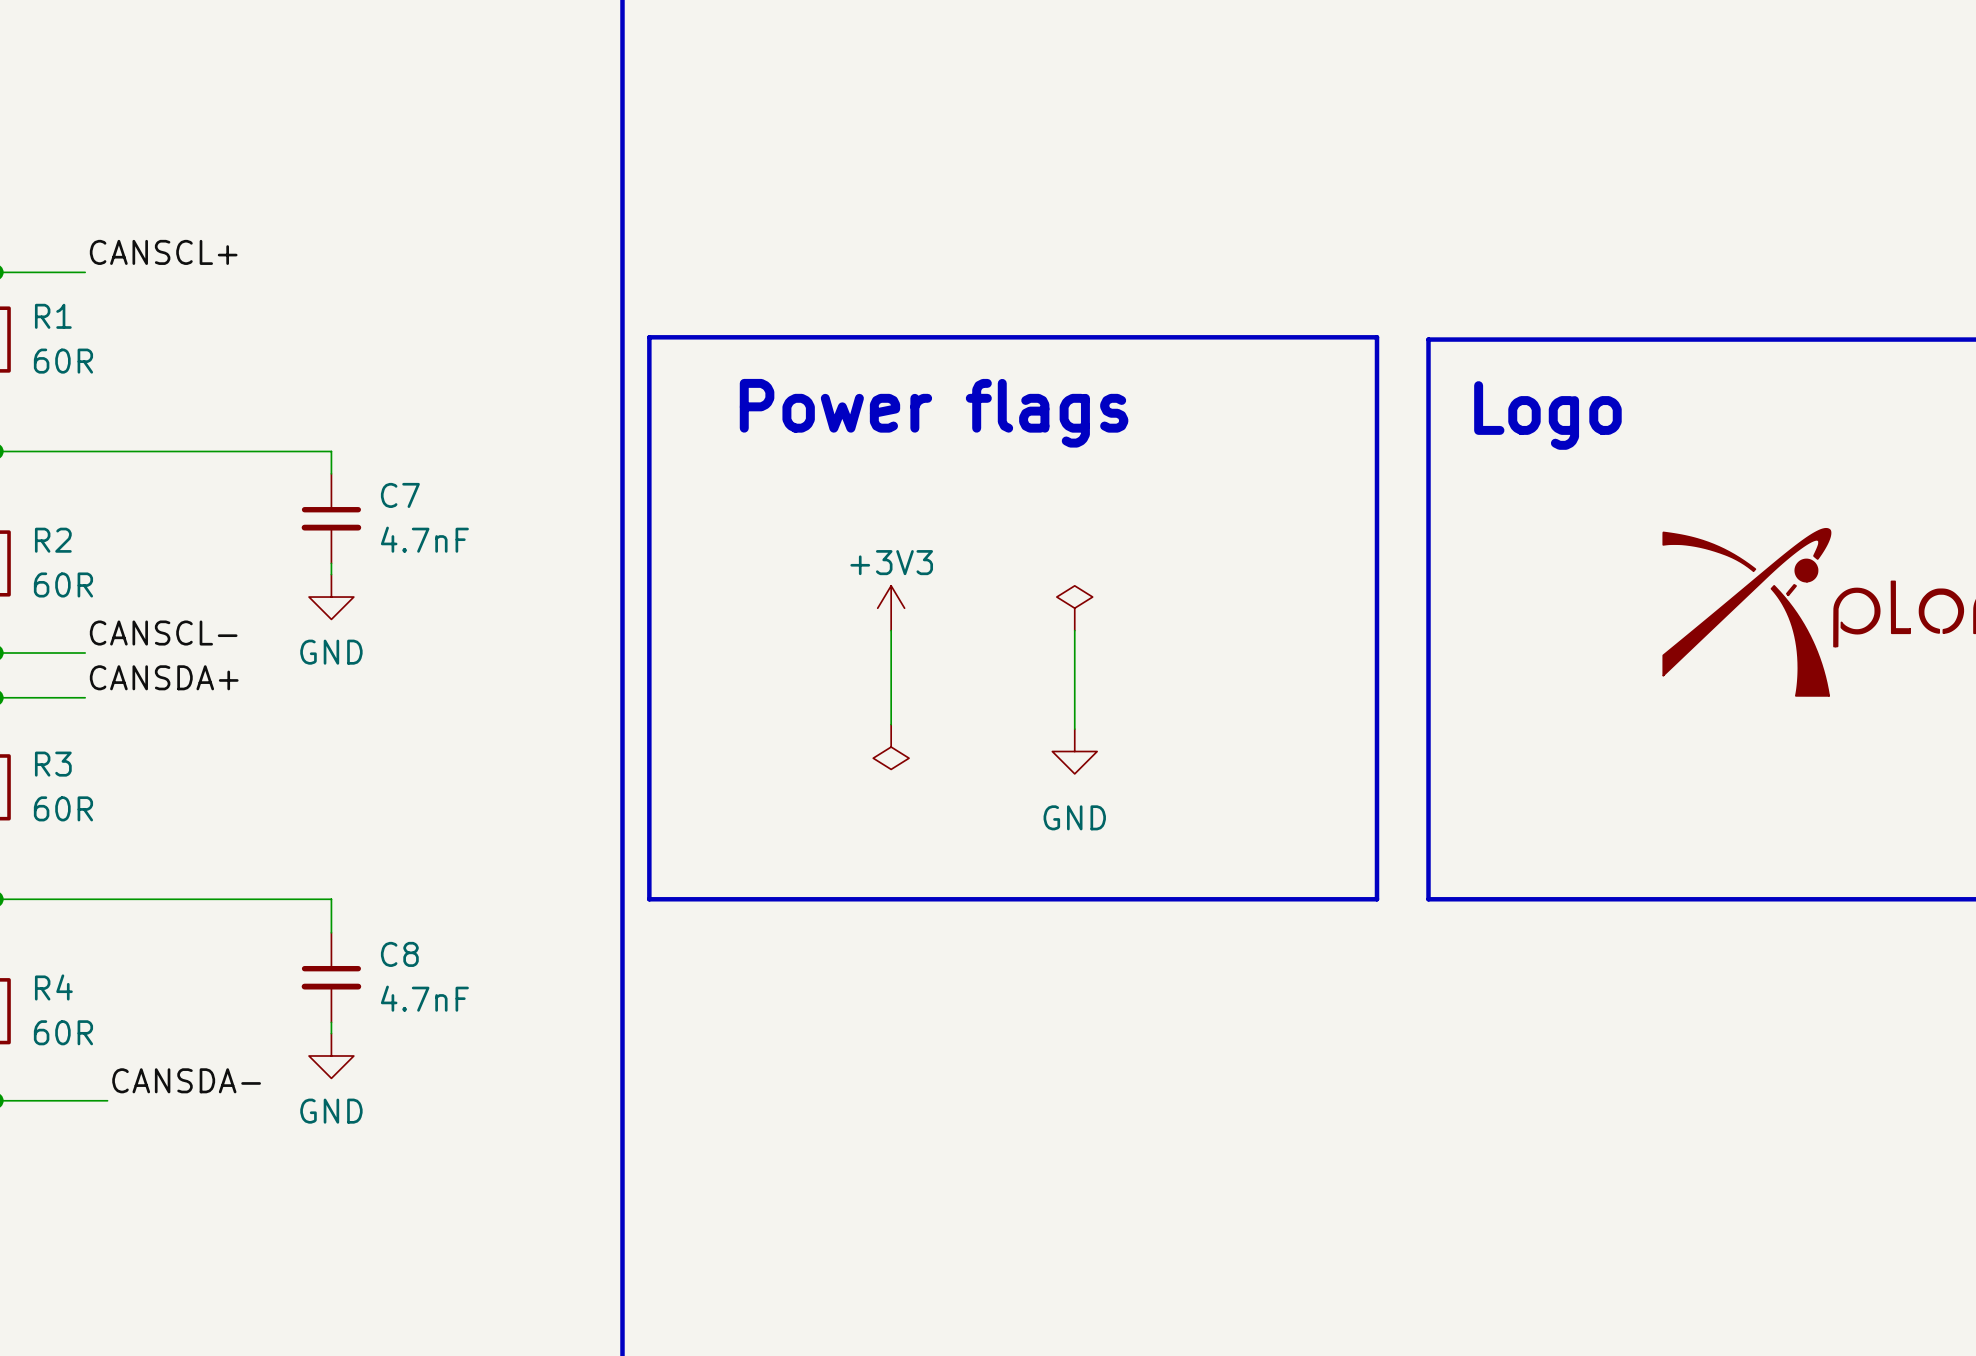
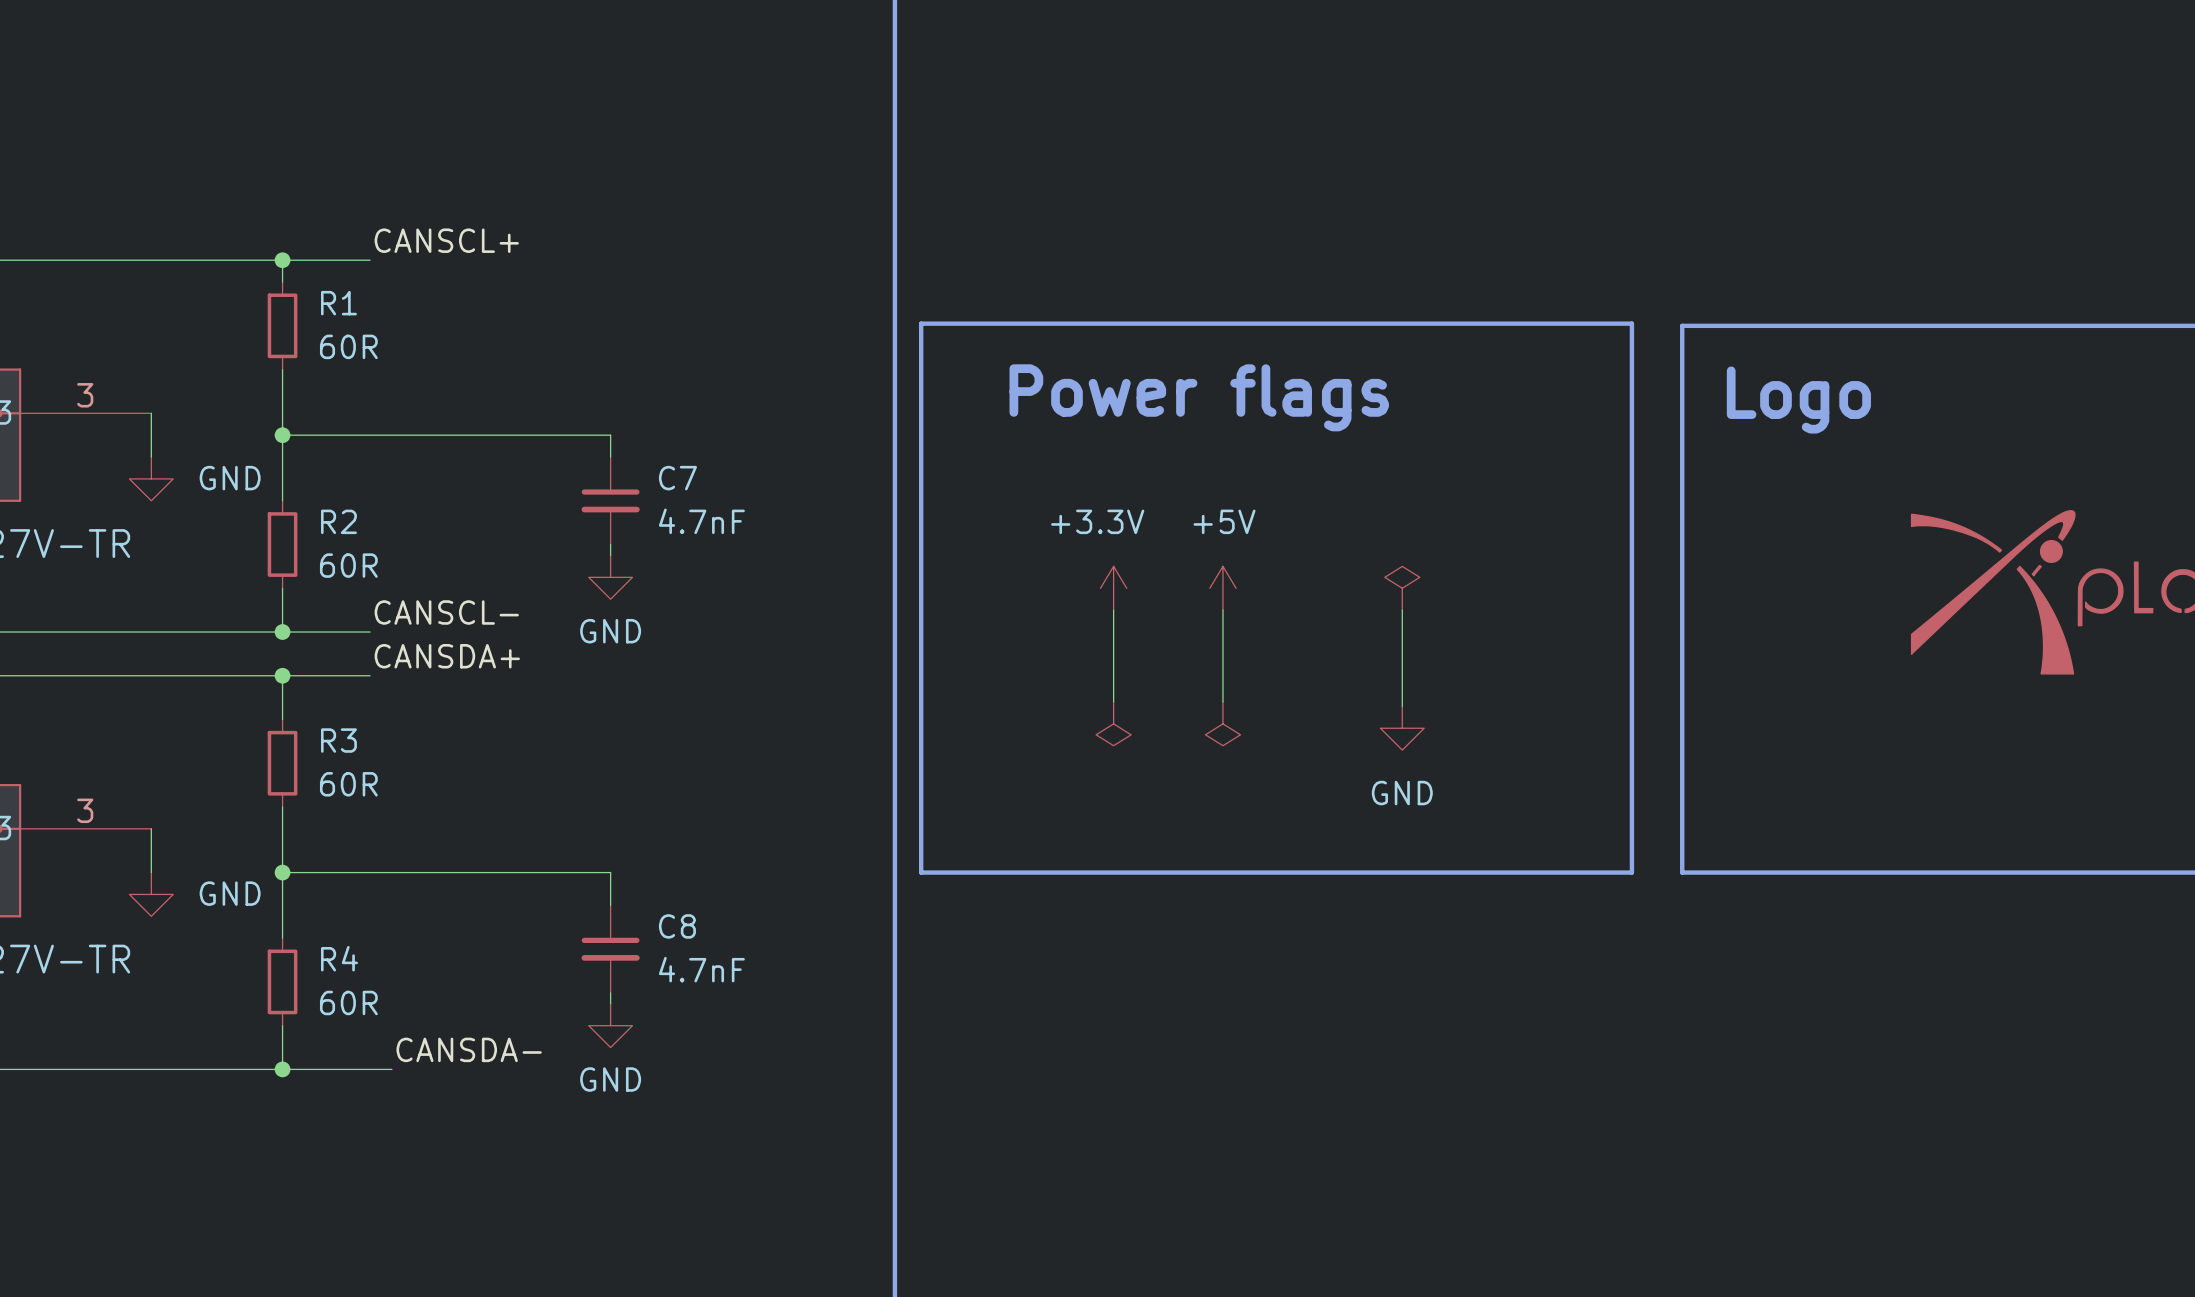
power symbol: none -> +3.3V (1113, 588)
power symbol: +3V3 (891, 608) -> none
power symbol: none -> +5V (1222, 588)
power symbol position: (1074, 608) -> (1402, 588)
wire: (891, 630) (891, 724) -> (1113, 610) (1113, 701)
wire: none -> (1222, 610) (1222, 701)
wire: (1074, 630) (1074, 729) -> (1402, 610) (1402, 706)
power symbol: none -> (1113, 723)
power symbol: (891, 747) -> none
power symbol: none -> (1222, 723)
power symbol position: GND (1074, 751) -> GND (1402, 728)

